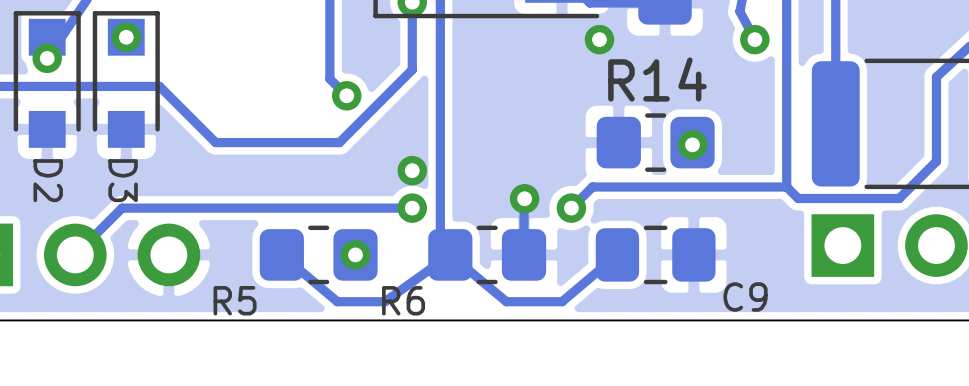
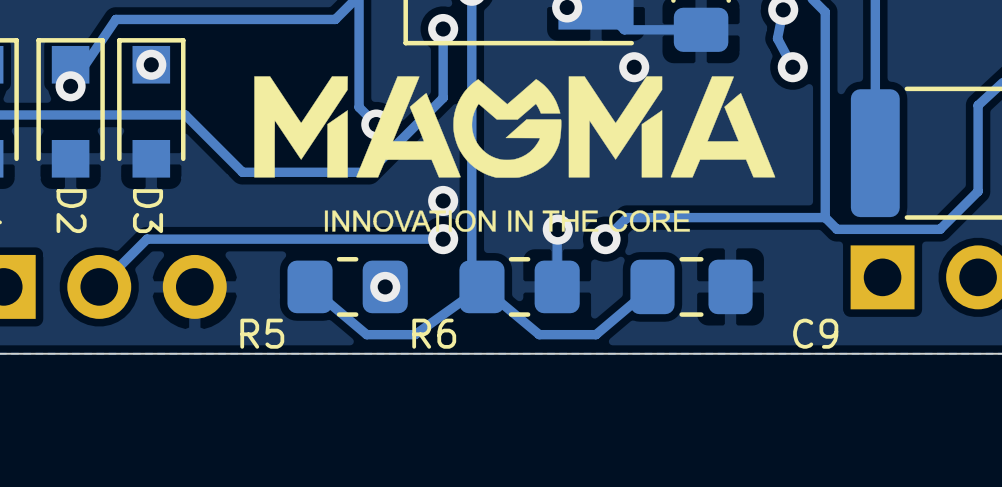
drawing: none -> [254, 76, 776, 232]
R14: (655, 142) -> none
via: (692, 144) -> none
C9 name position: C9 (745, 297) -> C9 (815, 333)

